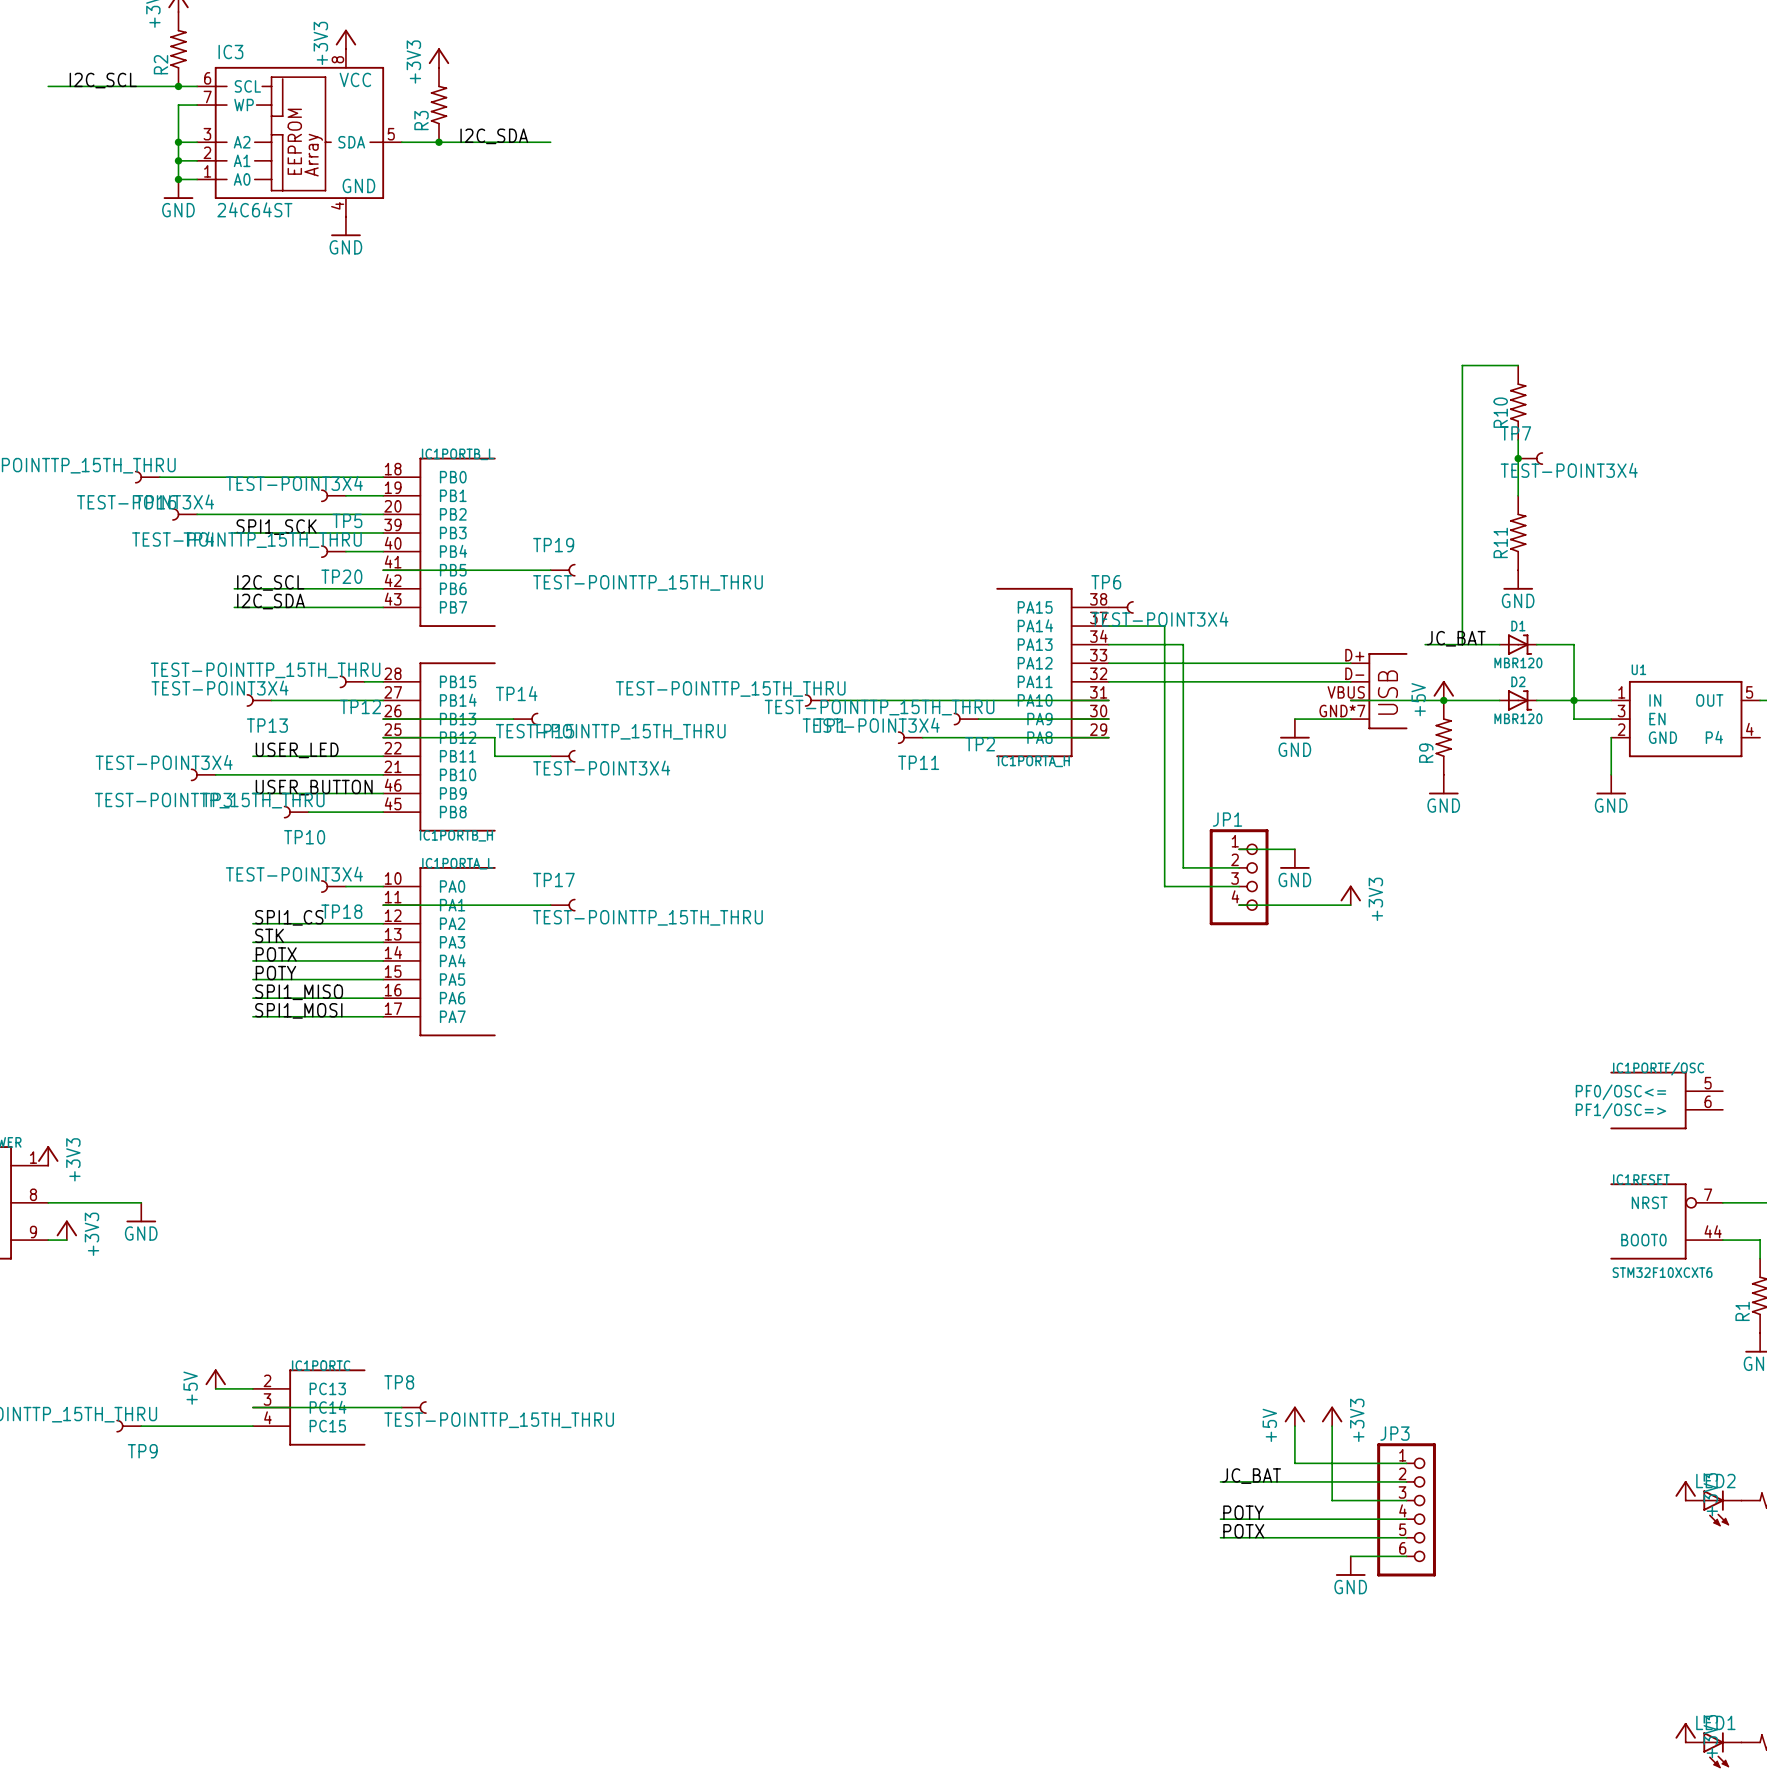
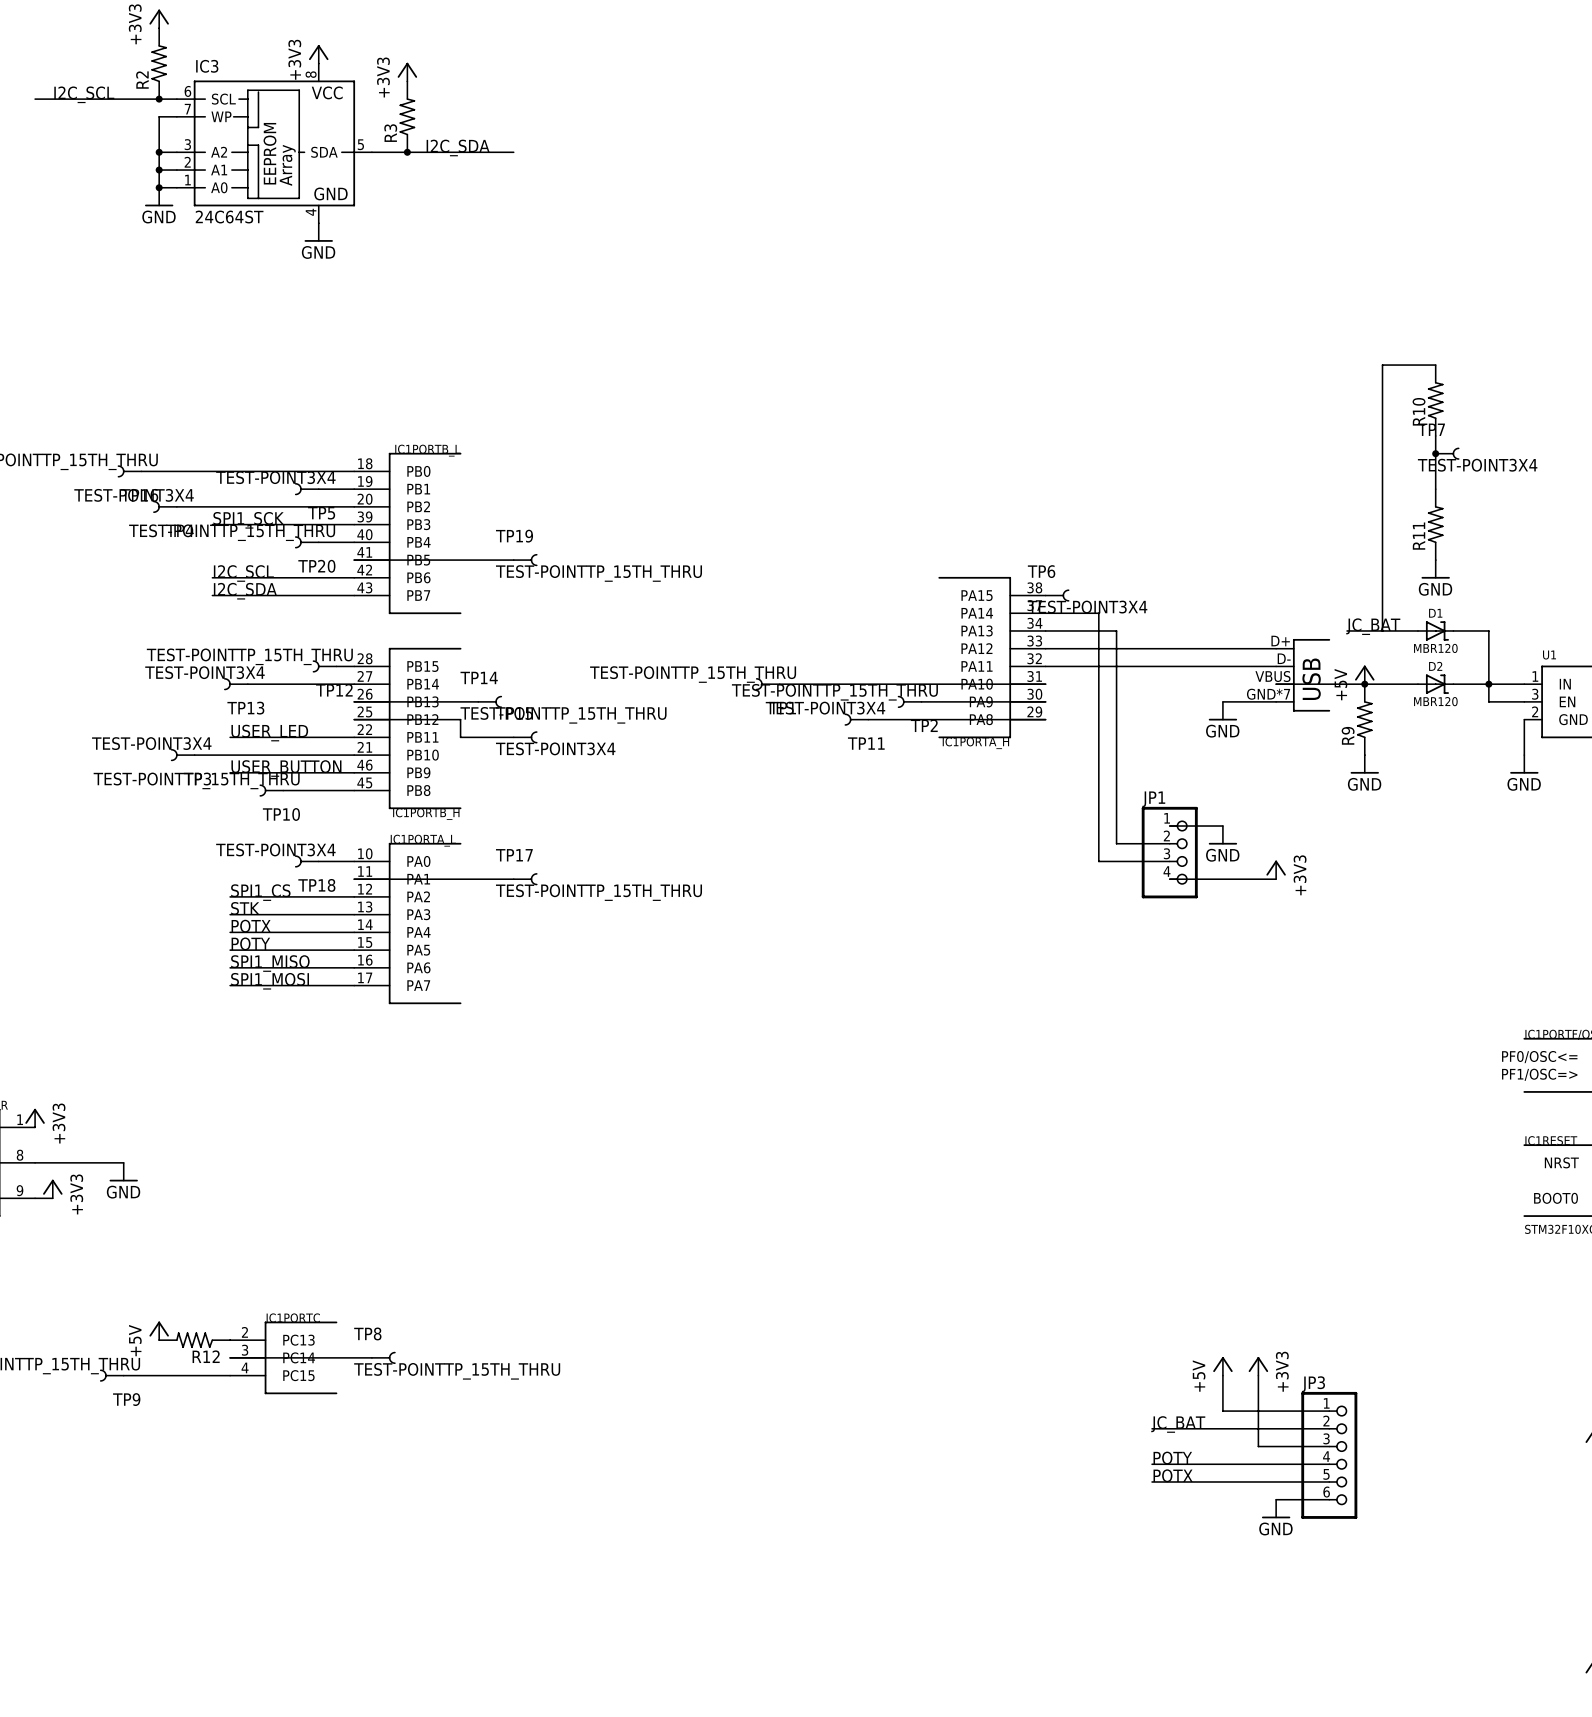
power symbol position: +5V (215, 1379) -> +5V (159, 1330)
R12: none -> (194, 1340)

